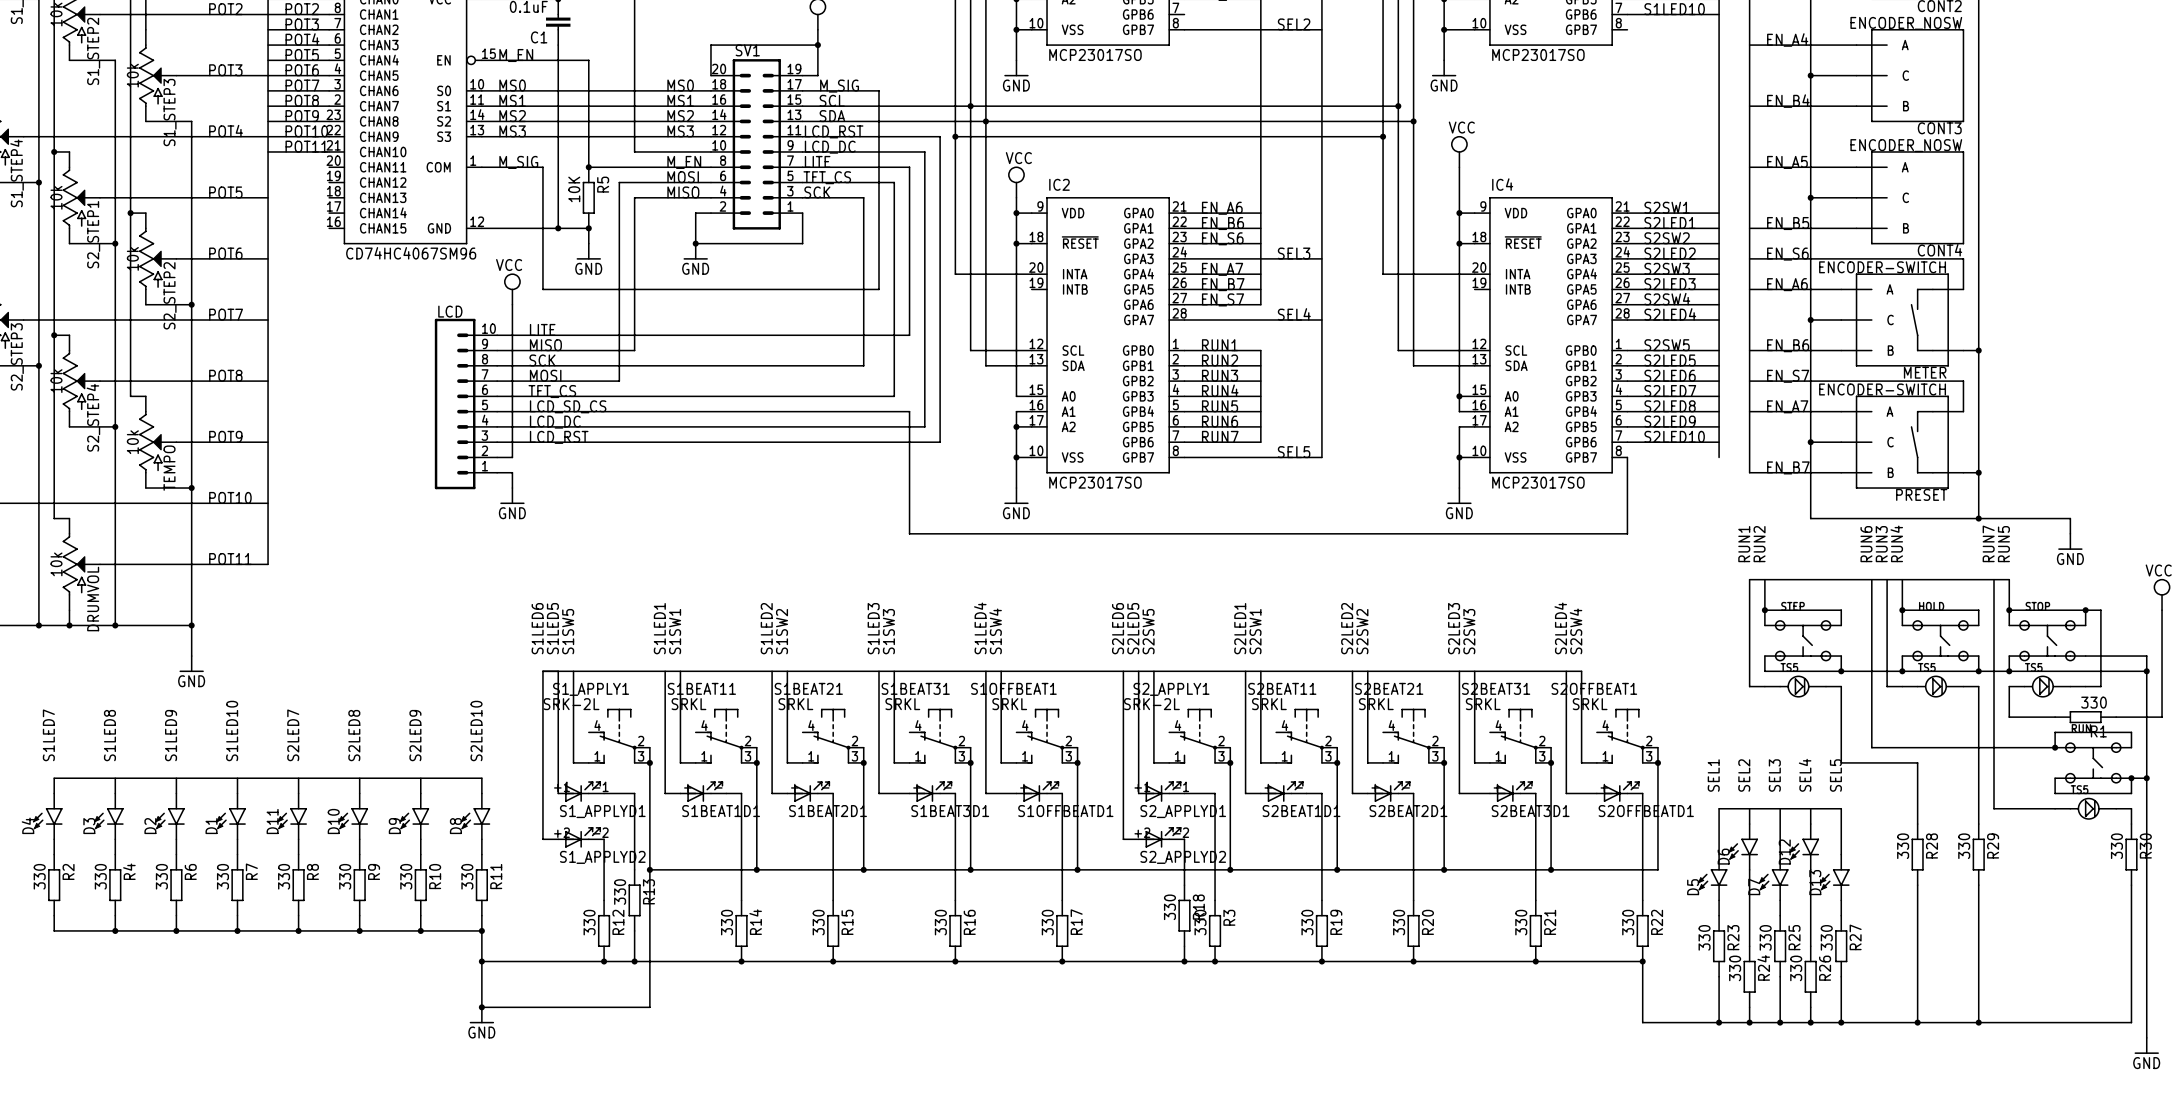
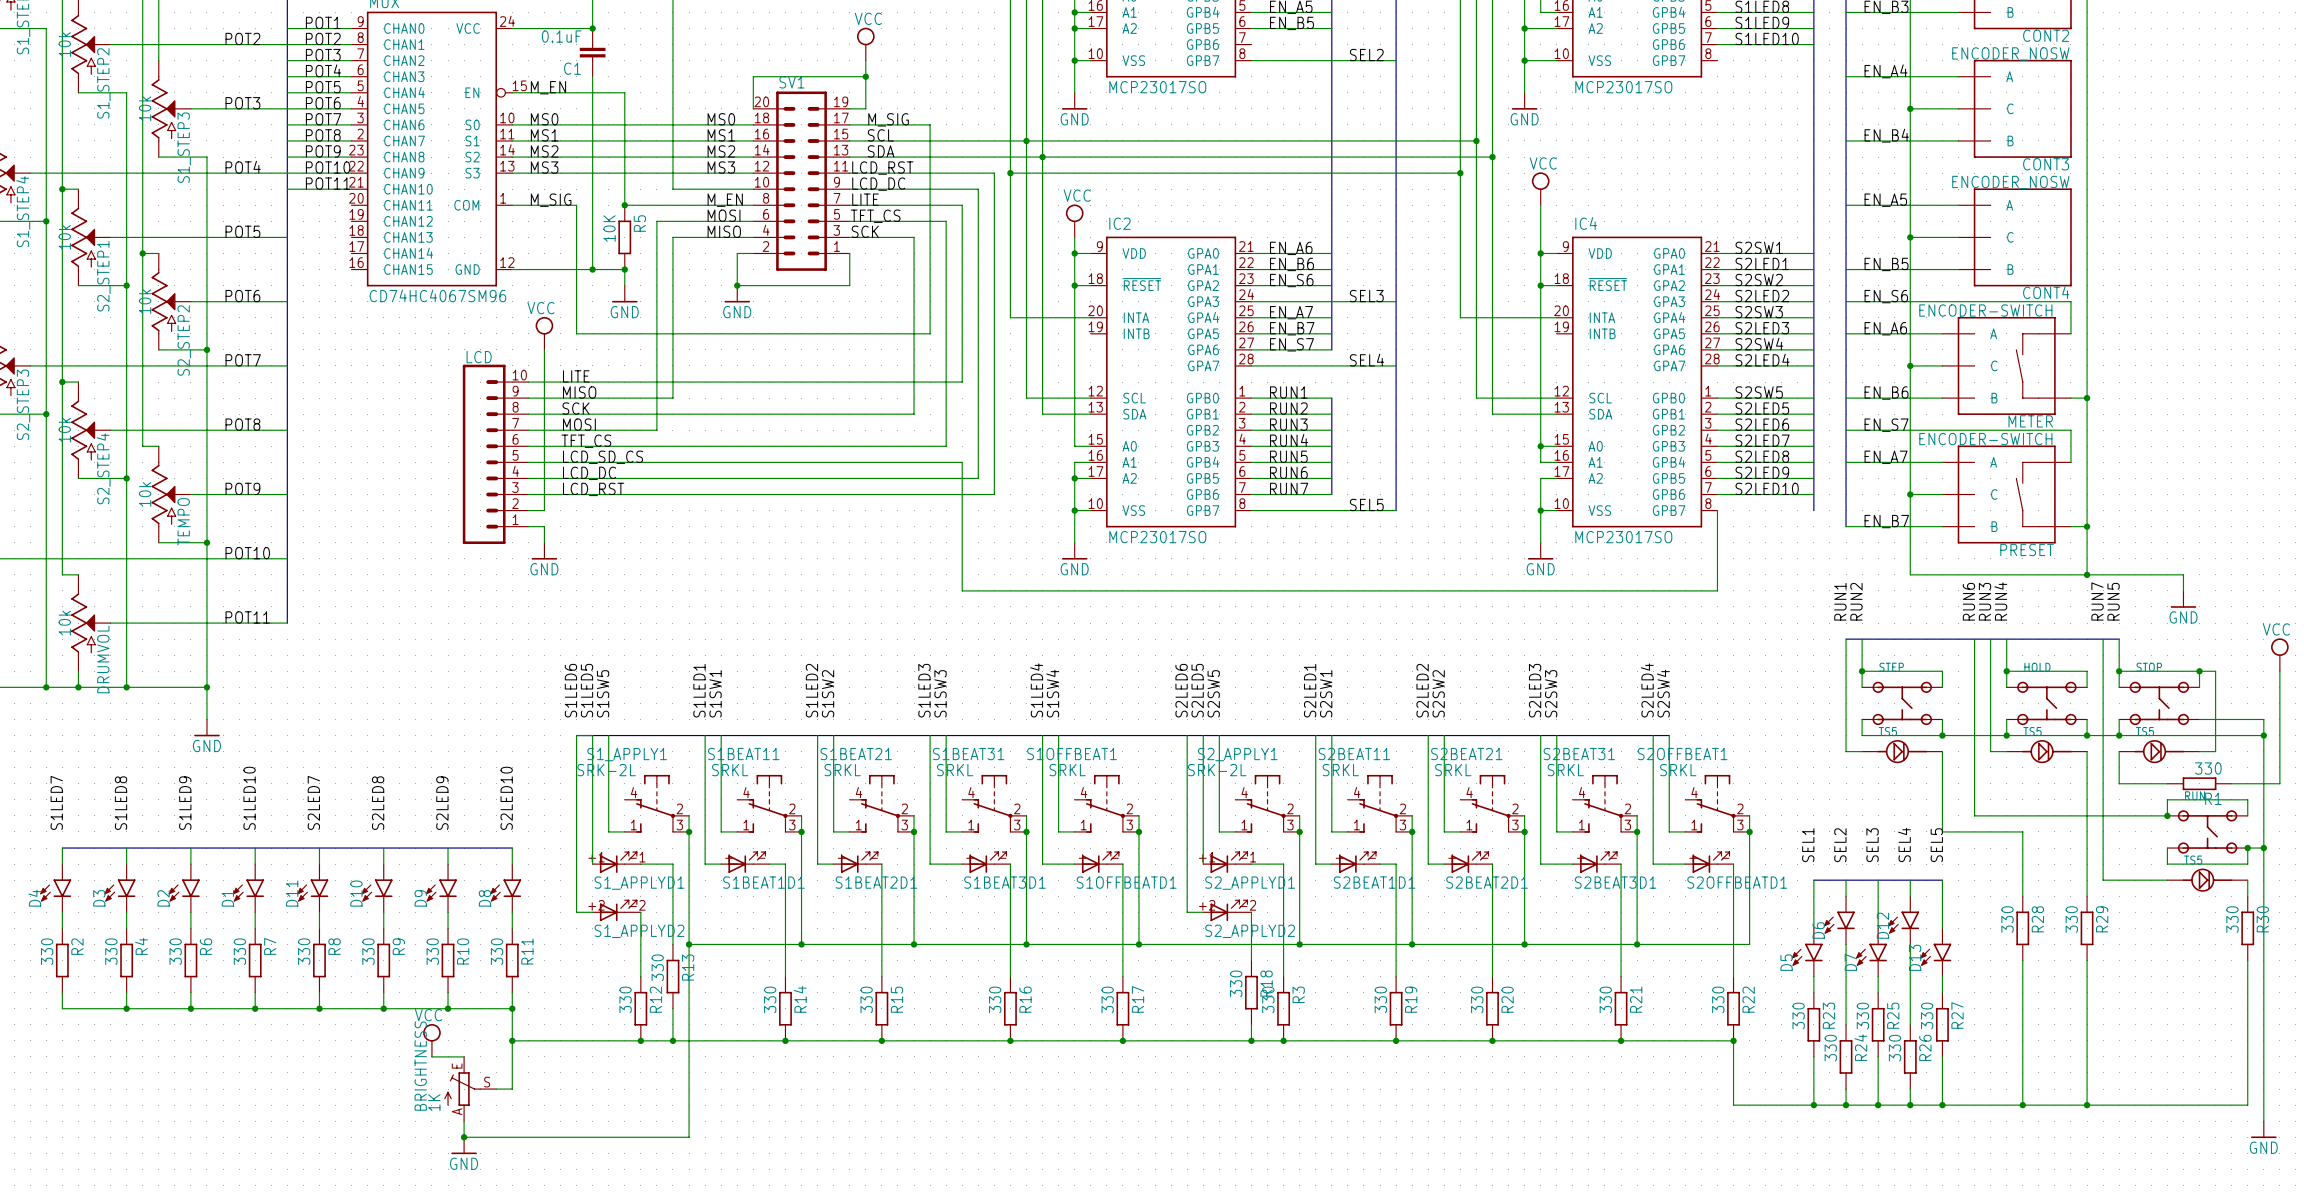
power symbol: none -> VCC (431, 1040)
wire: none -> (431, 1056) (464, 1056)
BRIGHTNESS: none -> 1K (470, 1089)
wire: none -> (496, 1089) (512, 1089)
wire: (481, 1007) (649, 1007) -> (464, 1121) (464, 1137) (689, 1137) (689, 1089)
junction: (481, 1007) -> none
power symbol position: GND (481, 1015) -> GND (464, 1145)
junction: none -> (464, 1137)

